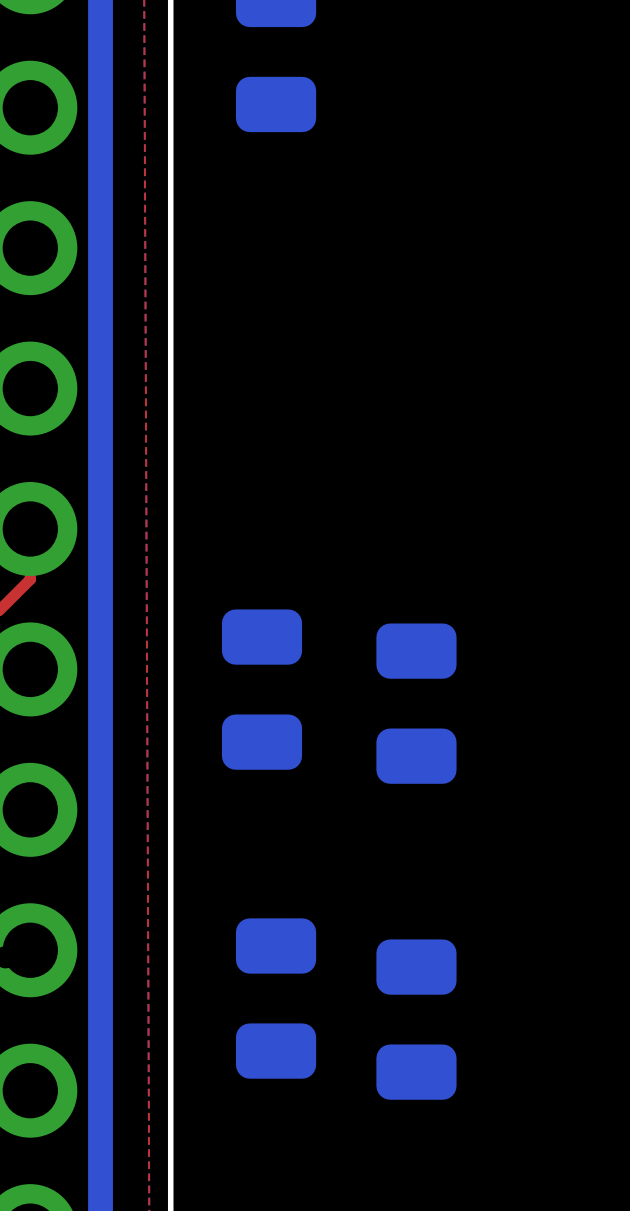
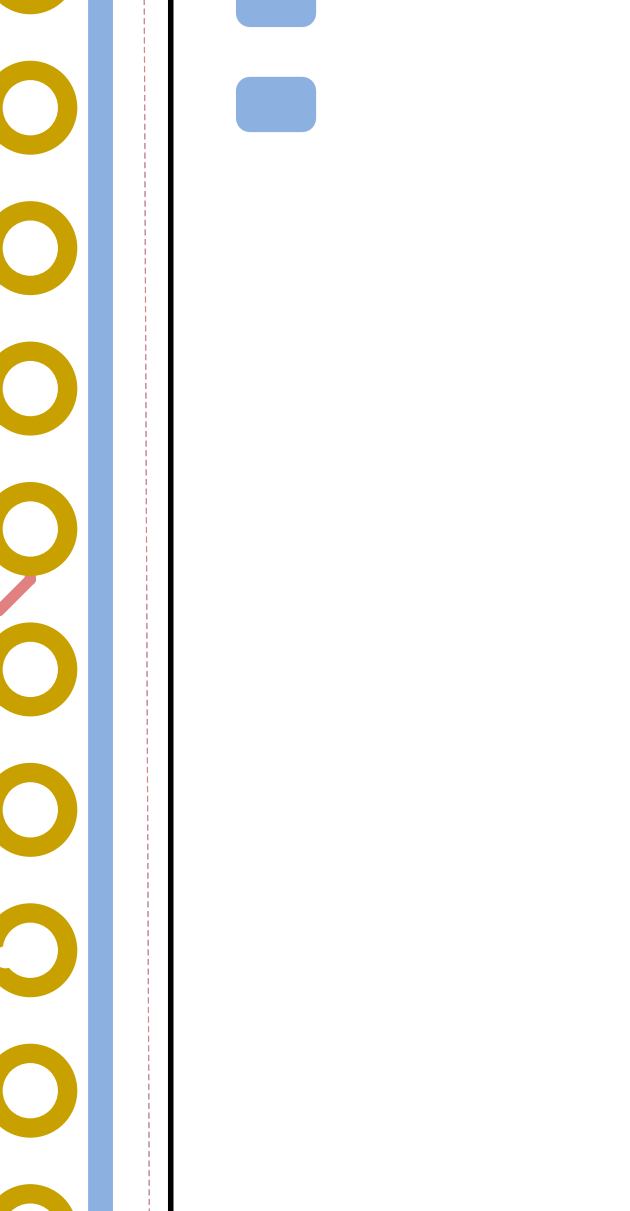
part: (262, 689) -> none
part: (416, 703) -> none
part: (276, 998) -> none
part: (416, 1019) -> none

